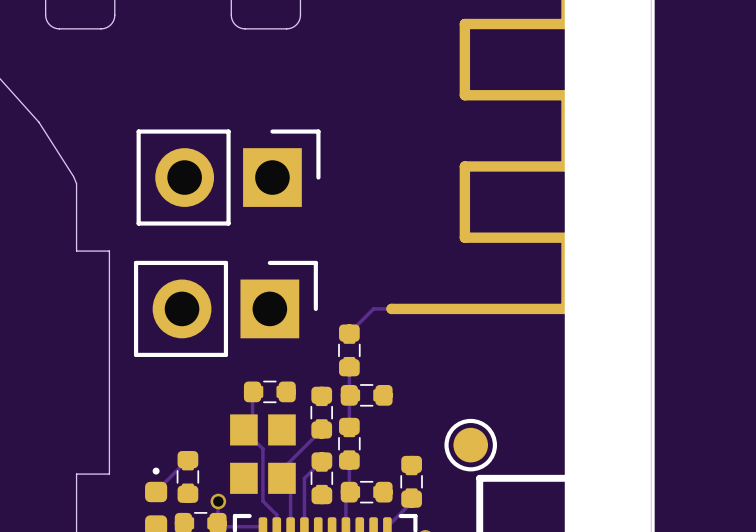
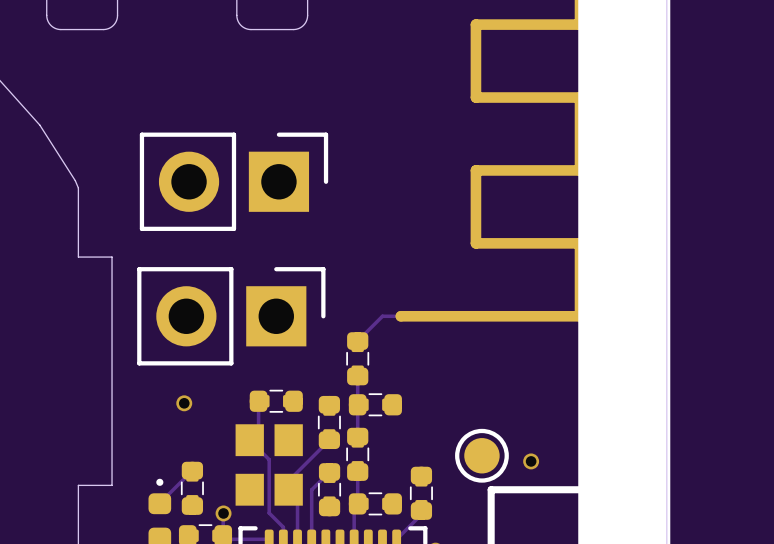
via: none -> (184, 403)
via: none -> (531, 461)

